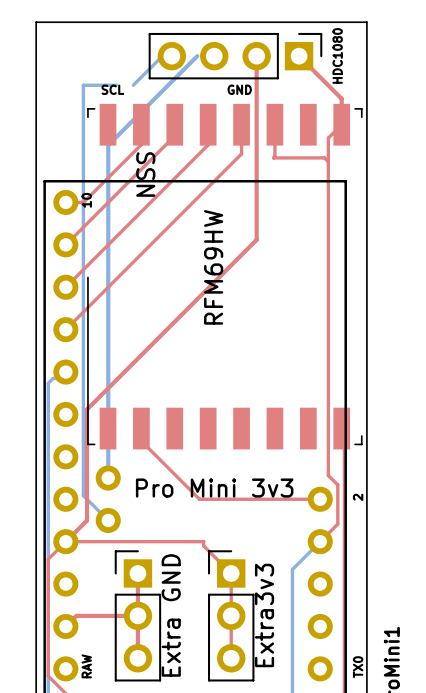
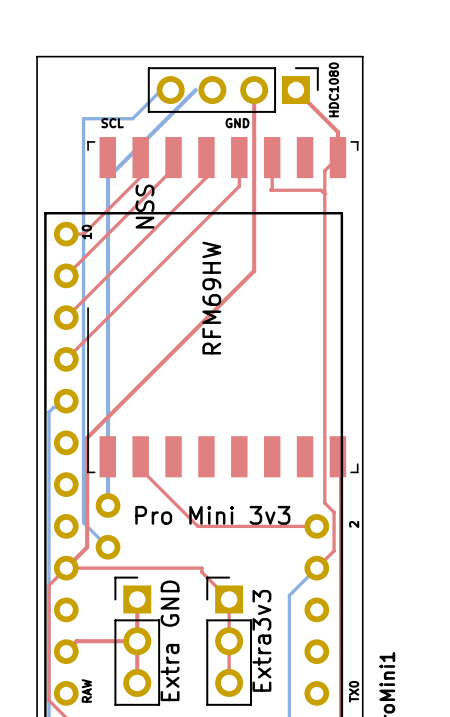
bottom track: none -> (116, 118) (132, 118)

